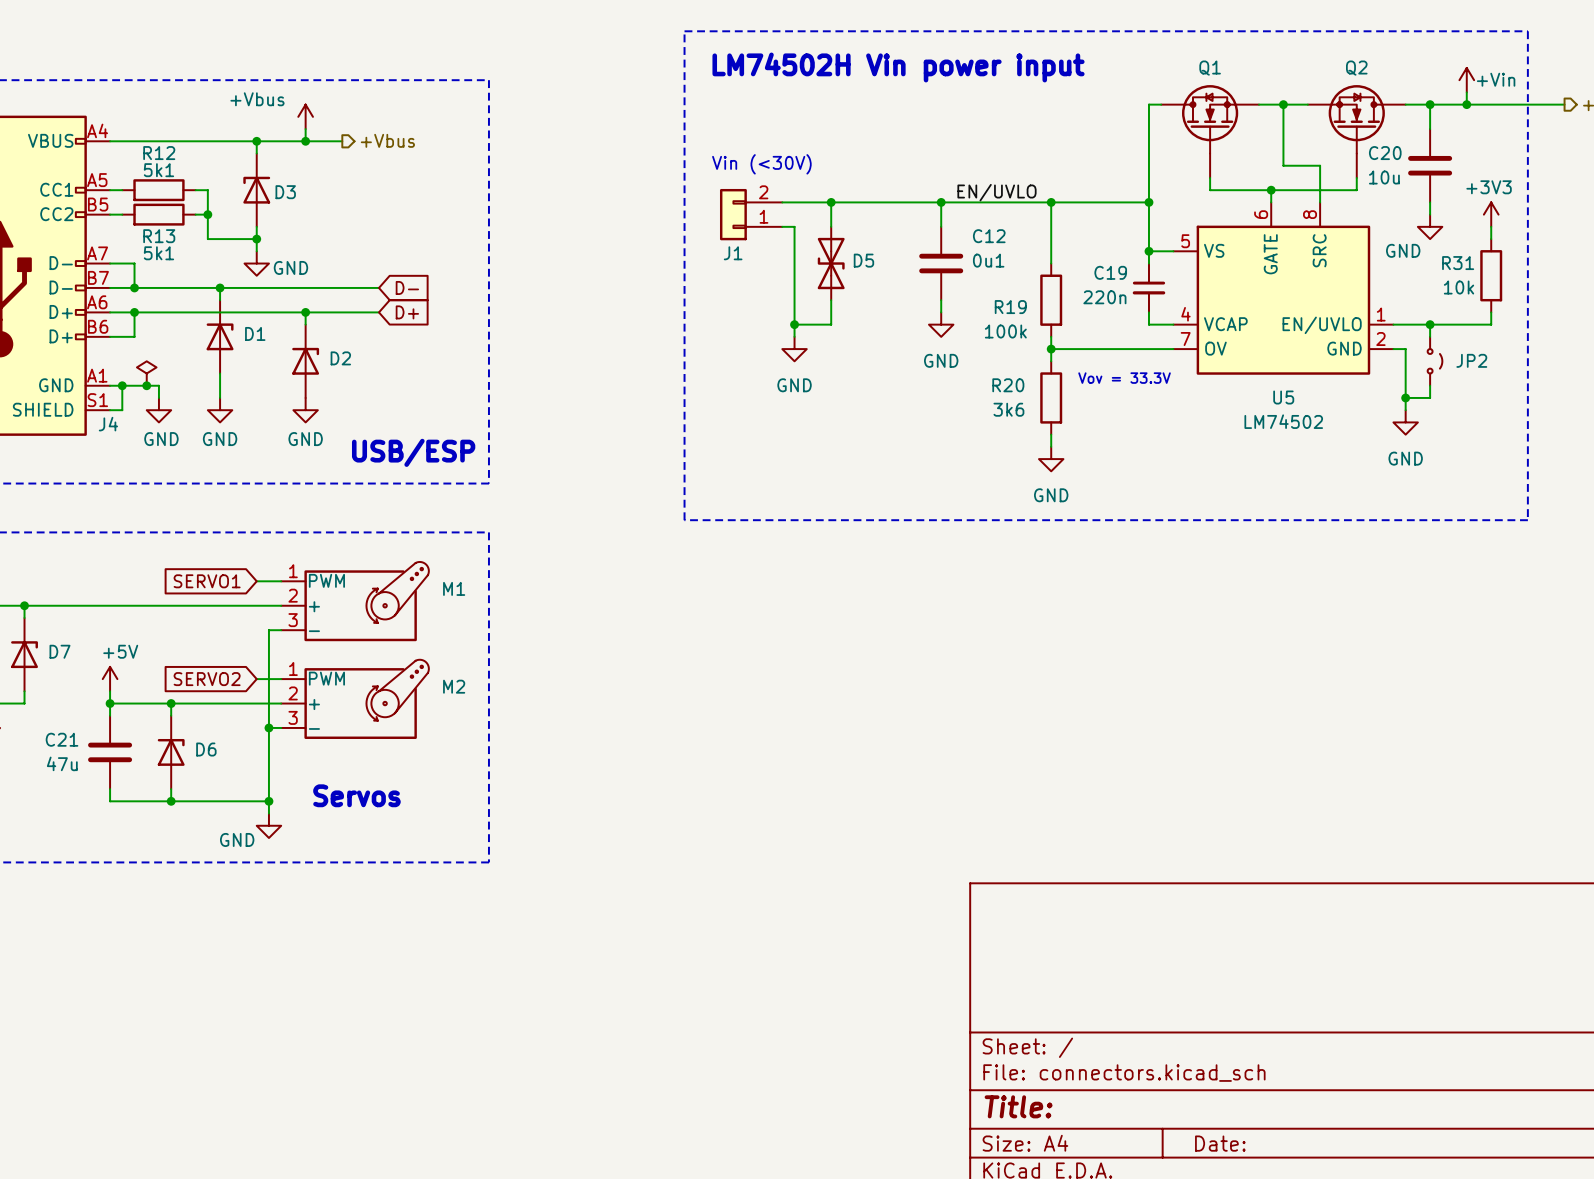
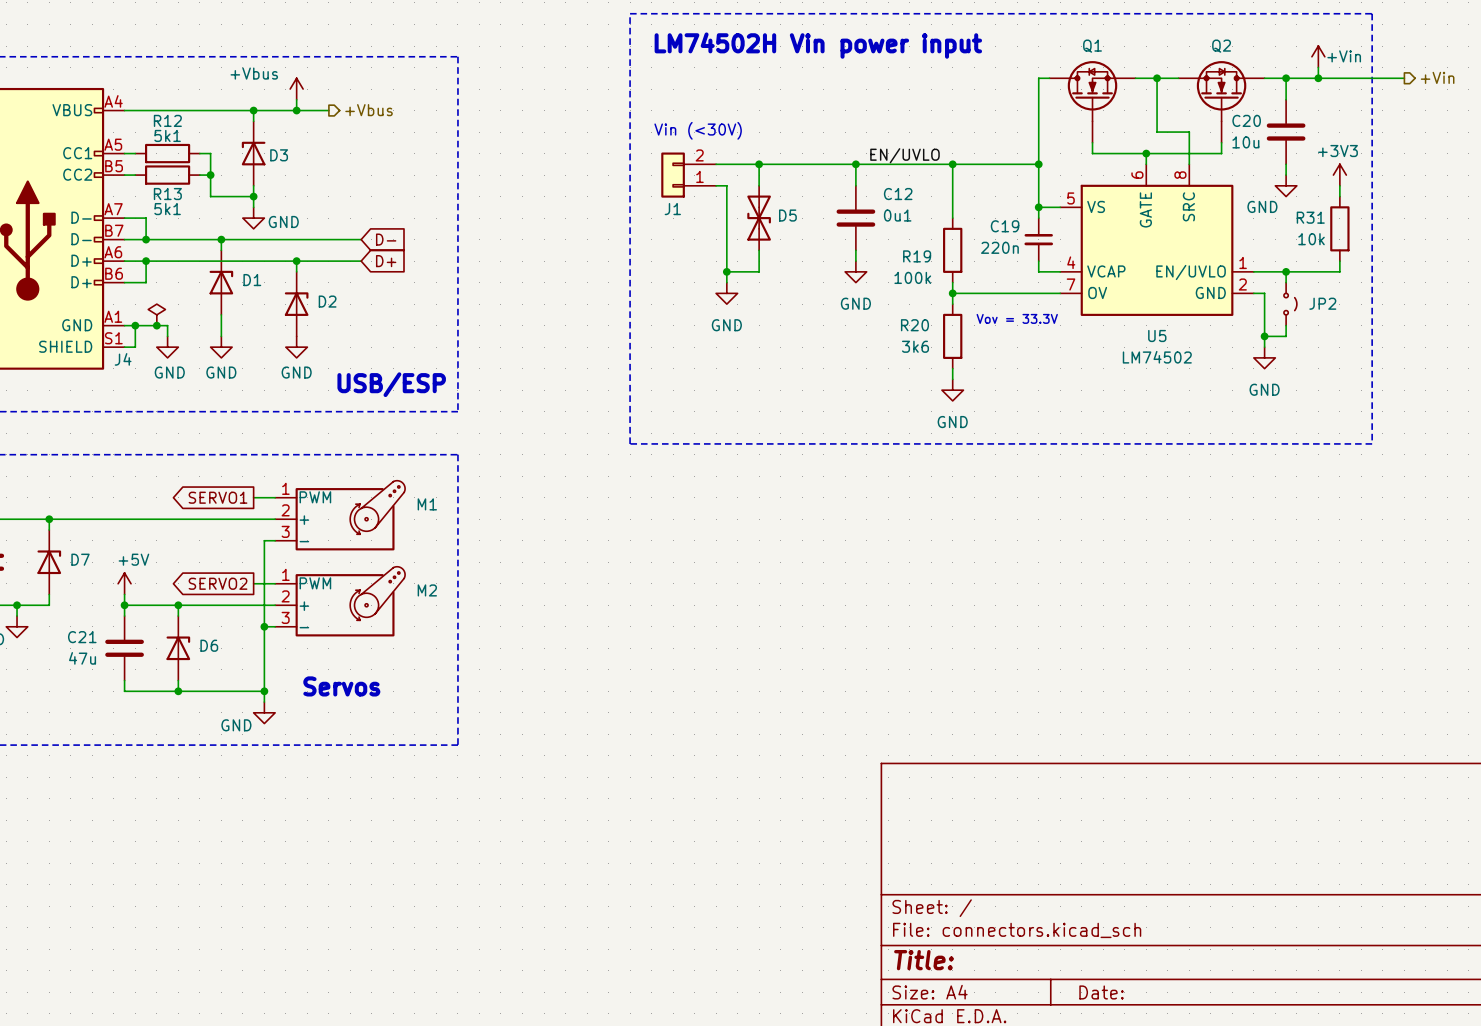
global label shape: input (207, 581) -> output (218, 497)
global label shape: input (207, 679) -> output (218, 583)

